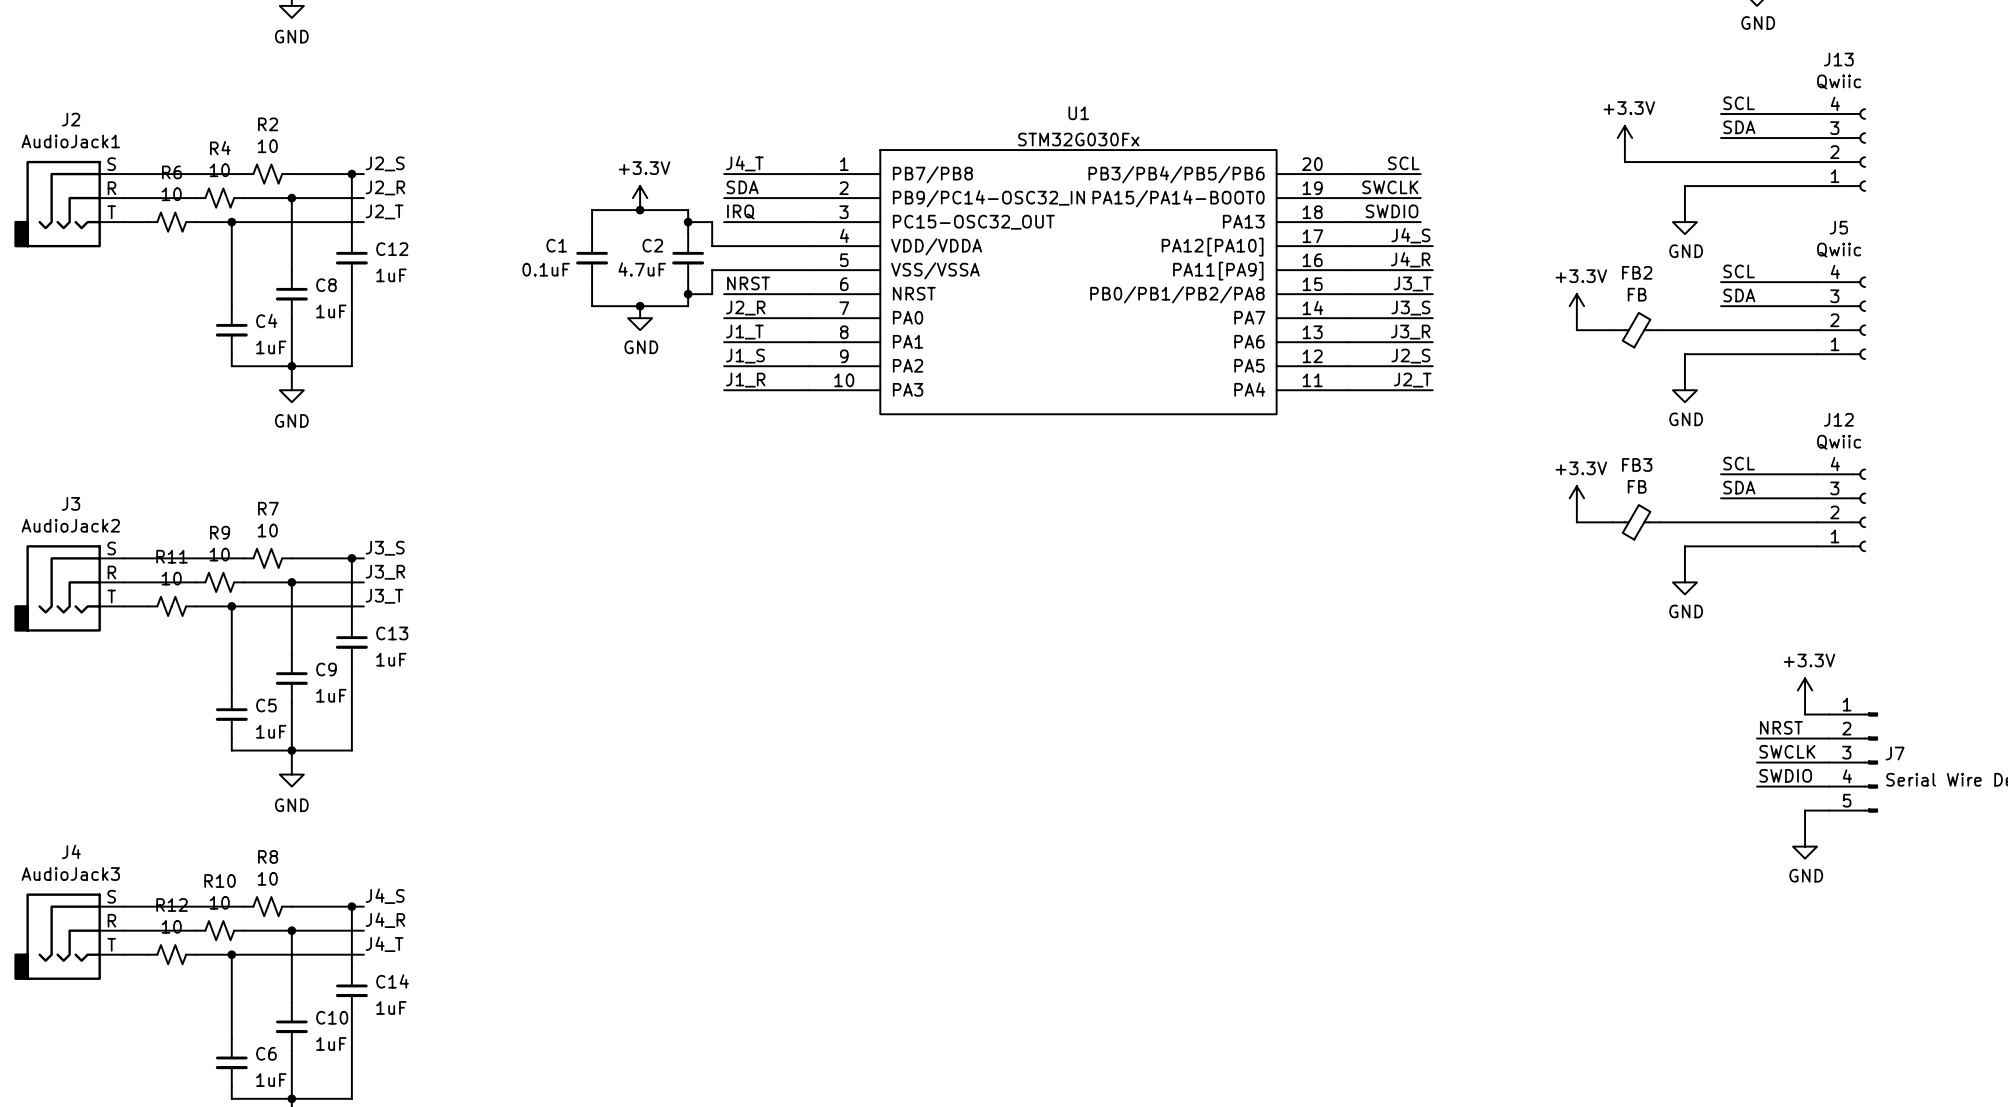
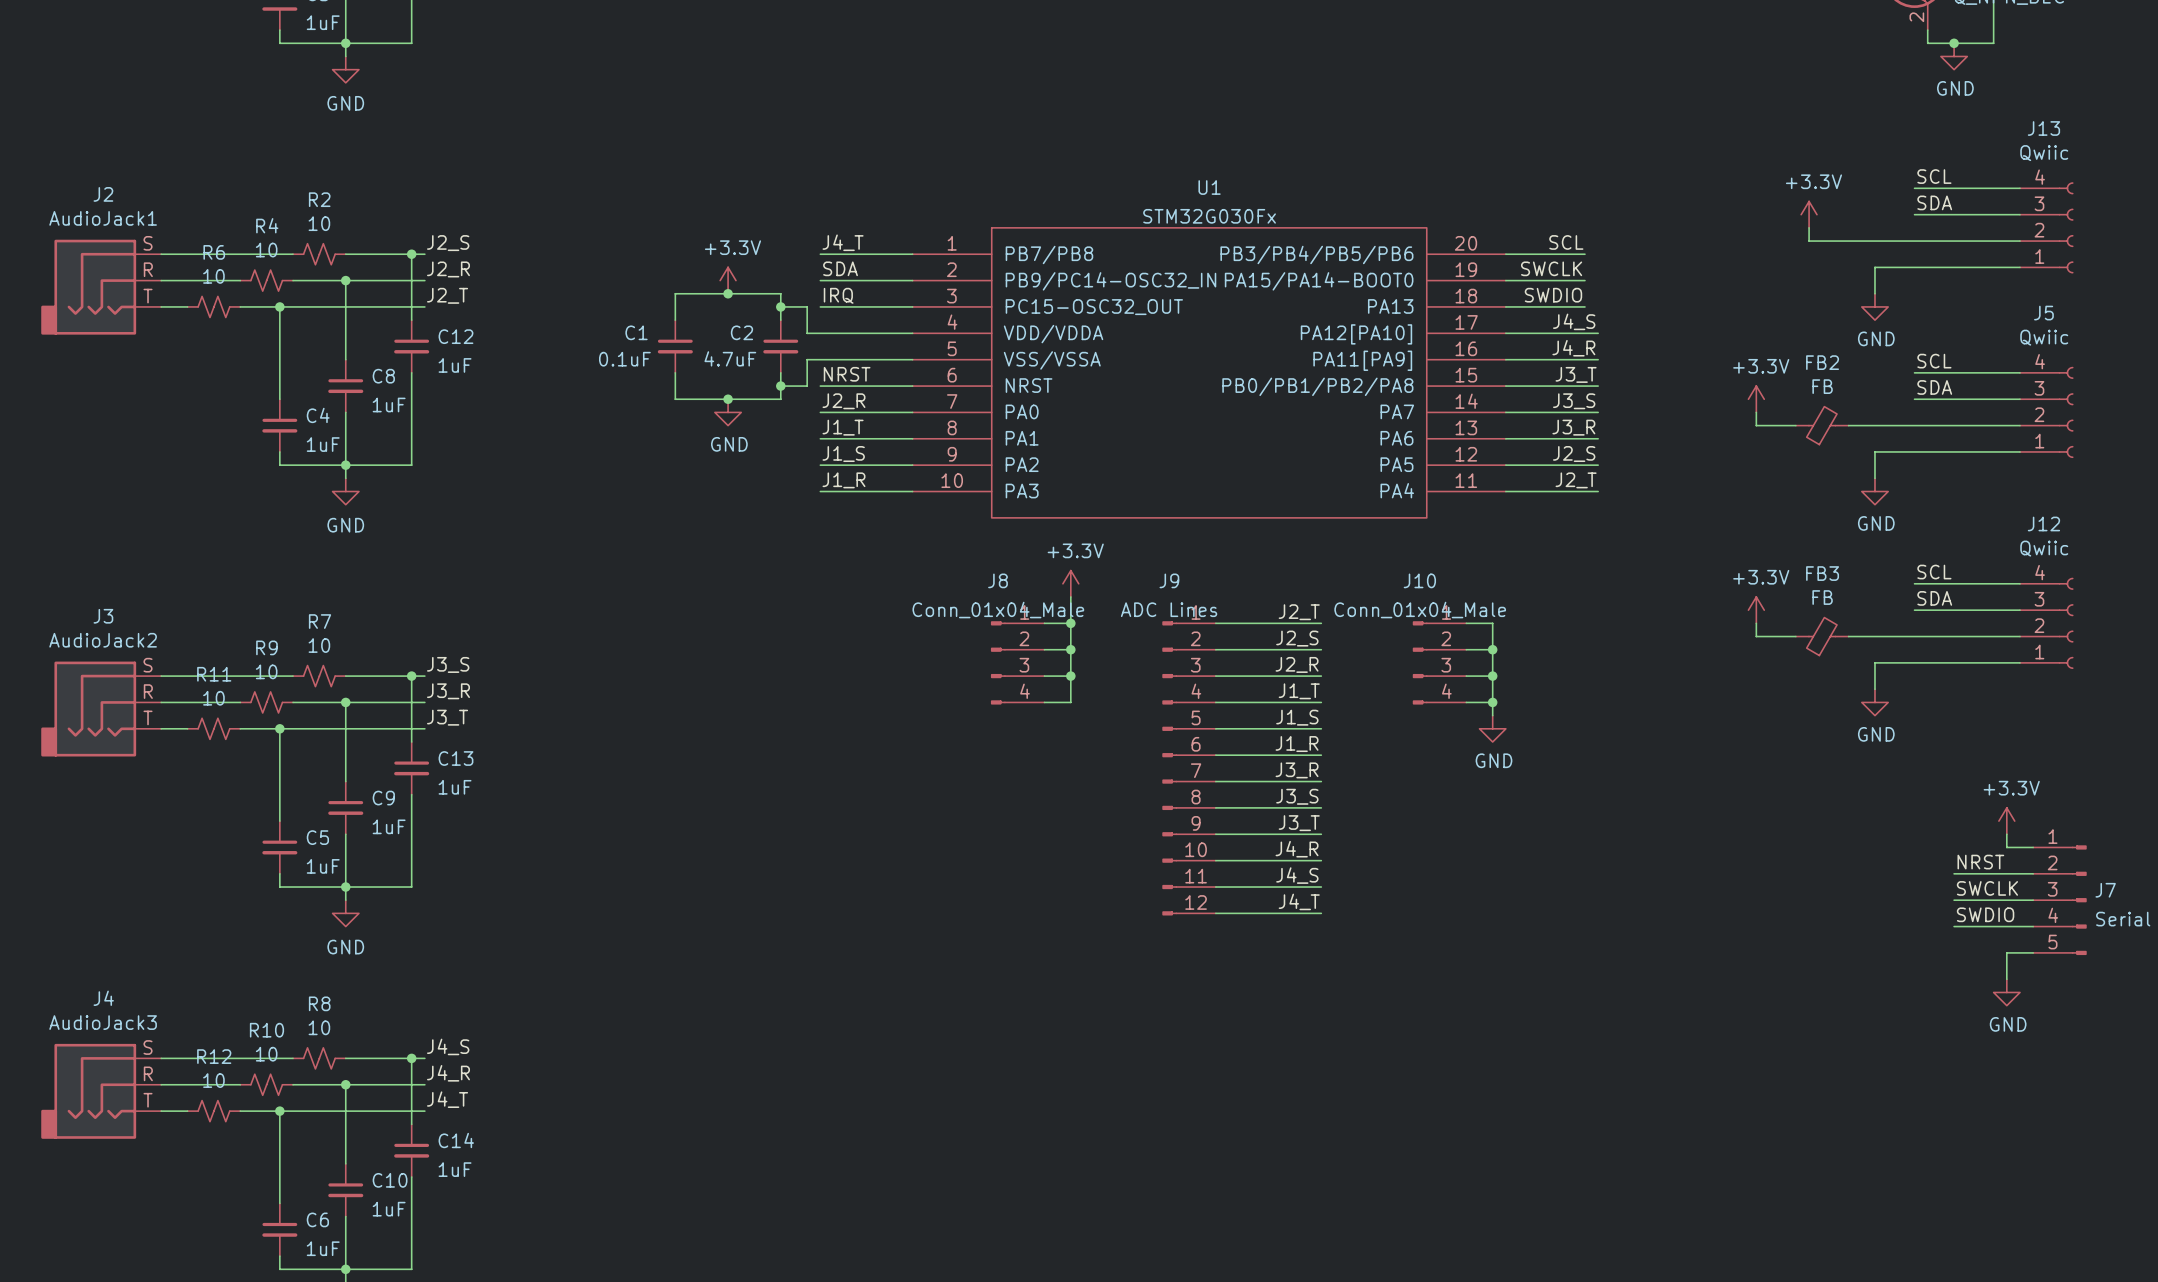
power symbol: none -> +3.3V (1070, 583)
wire: none -> (1070, 596) (1070, 702) (1044, 702)
label: none -> J2_T (1299, 612)
wire: none -> (1044, 623) (1070, 623)
junction: none -> (1070, 623)
wire: none -> (1215, 623) (1321, 623)
wire: none -> (1466, 623) (1492, 623) (1492, 715)
label: none -> J2_S (1297, 638)
wire: none -> (1044, 649) (1070, 649)
junction: none -> (1070, 649)
wire: none -> (1215, 649) (1321, 649)
wire: none -> (1466, 649) (1492, 649)
junction: none -> (1492, 649)
J8: none -> Conn_01x04_Male (1017, 662)
J10: none -> Conn_01x04_Male (1439, 662)
label: none -> J2_R (1297, 664)
wire: none -> (1044, 676) (1070, 676)
junction: none -> (1070, 676)
wire: none -> (1215, 676) (1321, 676)
wire: none -> (1466, 676) (1492, 676)
junction: none -> (1492, 676)
label: none -> J1_T (1299, 691)
wire: none -> (1215, 702) (1321, 702)
wire: none -> (1466, 702) (1492, 702)
junction: none -> (1492, 702)
label: none -> J1_S (1297, 717)
wire: none -> (1215, 728) (1321, 728)
power symbol: none -> GND (1492, 728)
label: none -> J1_R (1297, 744)
wire: none -> (1215, 755) (1321, 755)
J9: none -> ADC Lines (1189, 768)
label: none -> J3_R (1297, 770)
wire: none -> (1215, 781) (1321, 781)
label: none -> J3_S (1297, 796)
wire: none -> (1215, 807) (1321, 807)
label: none -> J3_T (1299, 823)
wire: none -> (1215, 834) (1321, 834)
label: none -> J4_R (1297, 849)
wire: none -> (1215, 860) (1321, 860)
label: none -> J4_S (1297, 875)
wire: none -> (1215, 887) (1321, 887)
label: none -> J4_T (1299, 901)
wire: none -> (1215, 913) (1321, 913)

